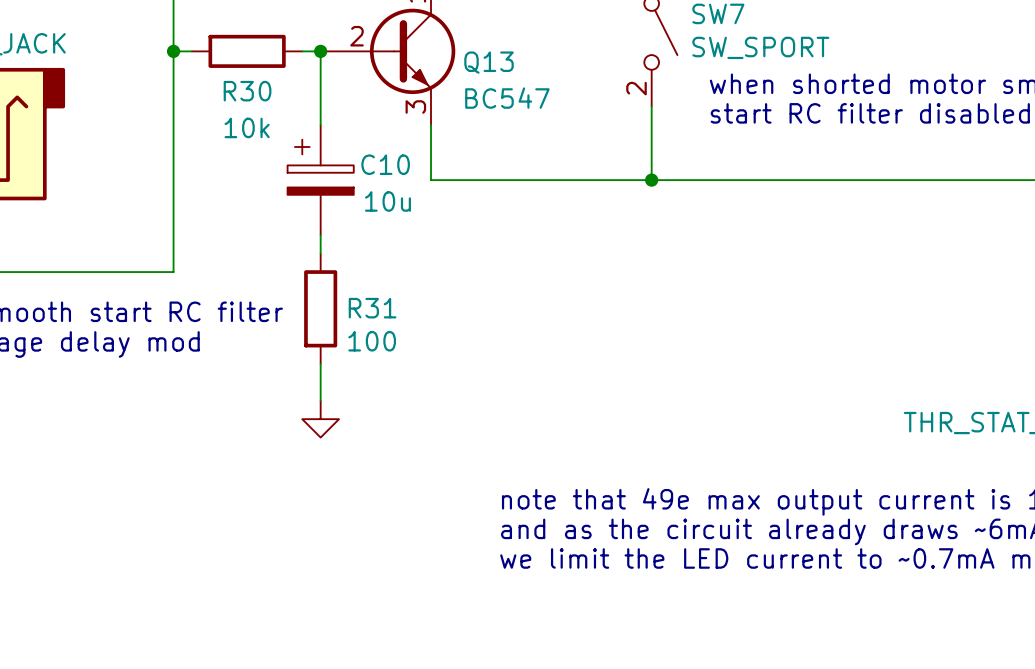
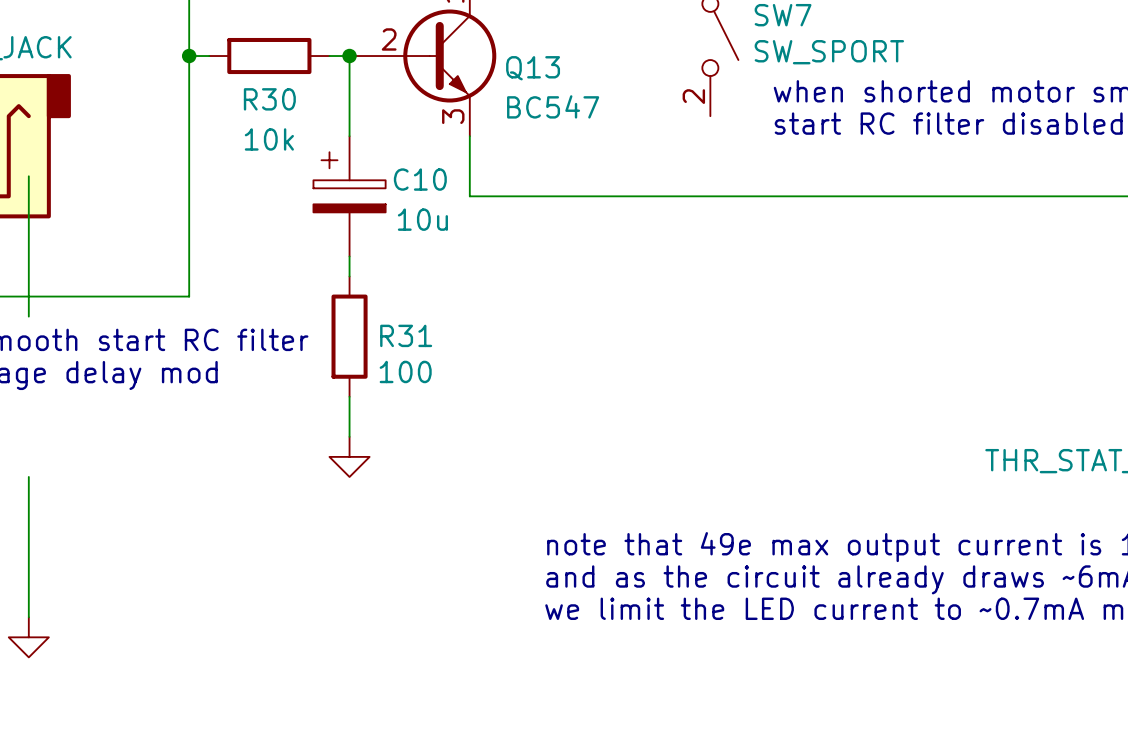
wire: (651, 106) (651, 180) -> none
wire: none -> (28, 176) (28, 316)
junction: (651, 180) -> none
wire: none -> (28, 476) (28, 617)
power symbol: none -> (28, 637)

